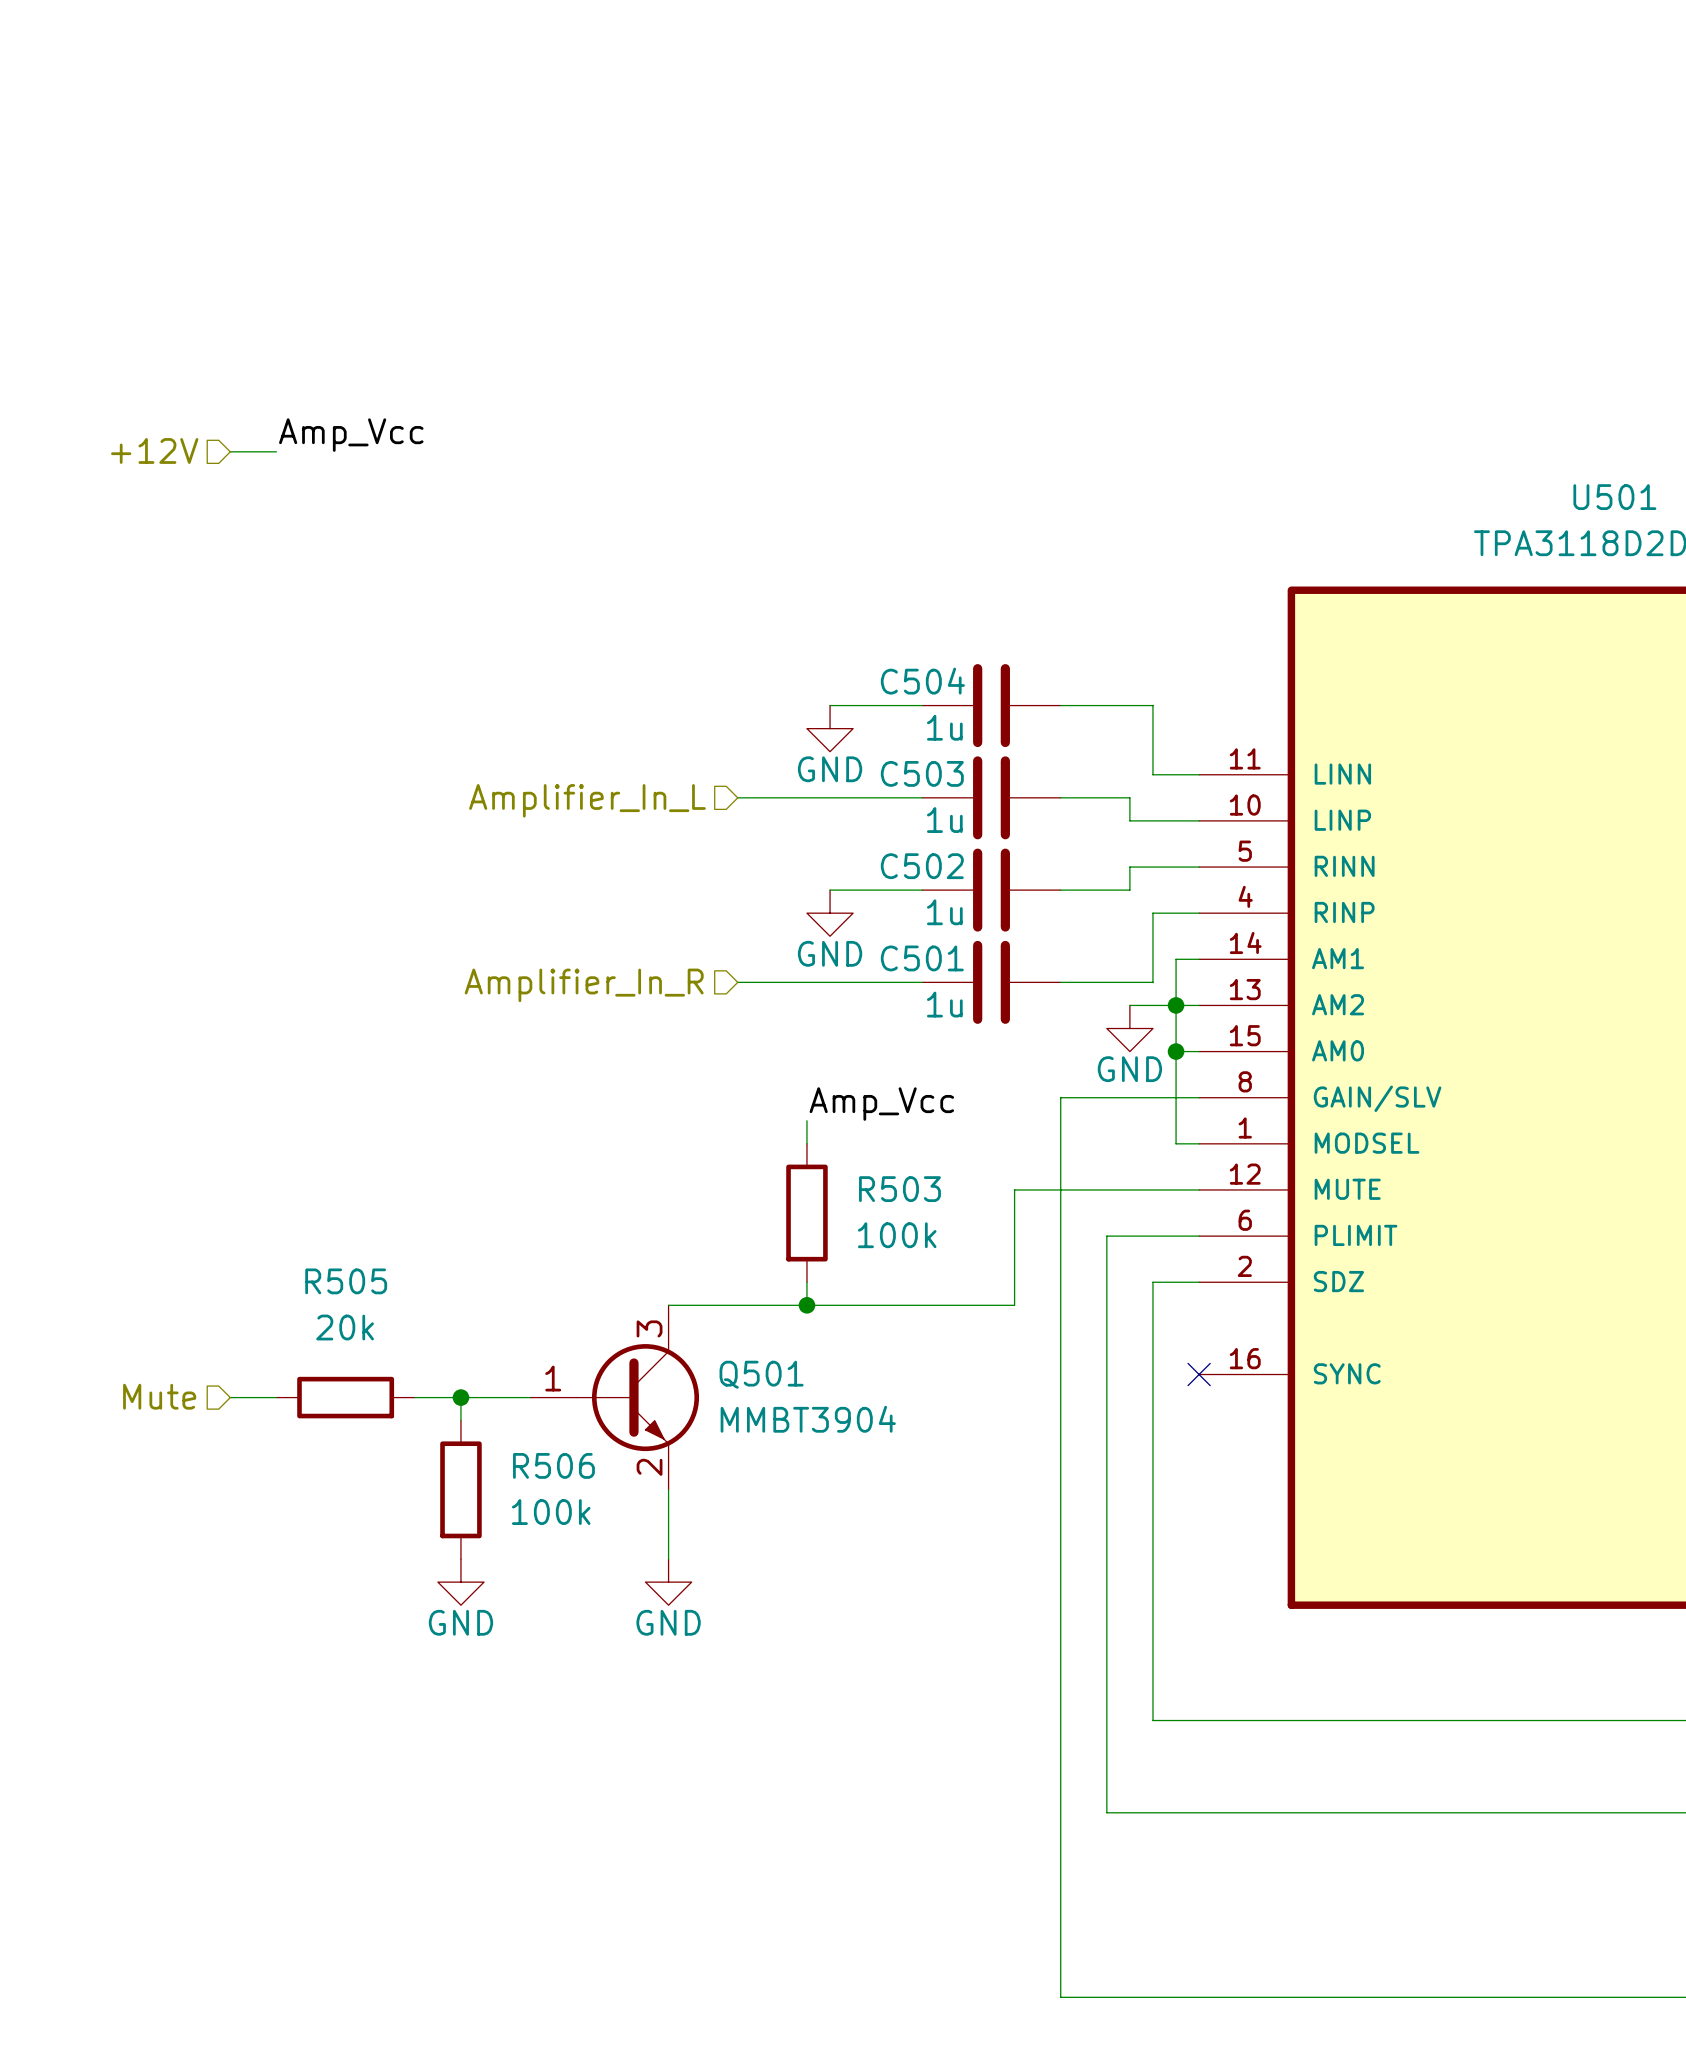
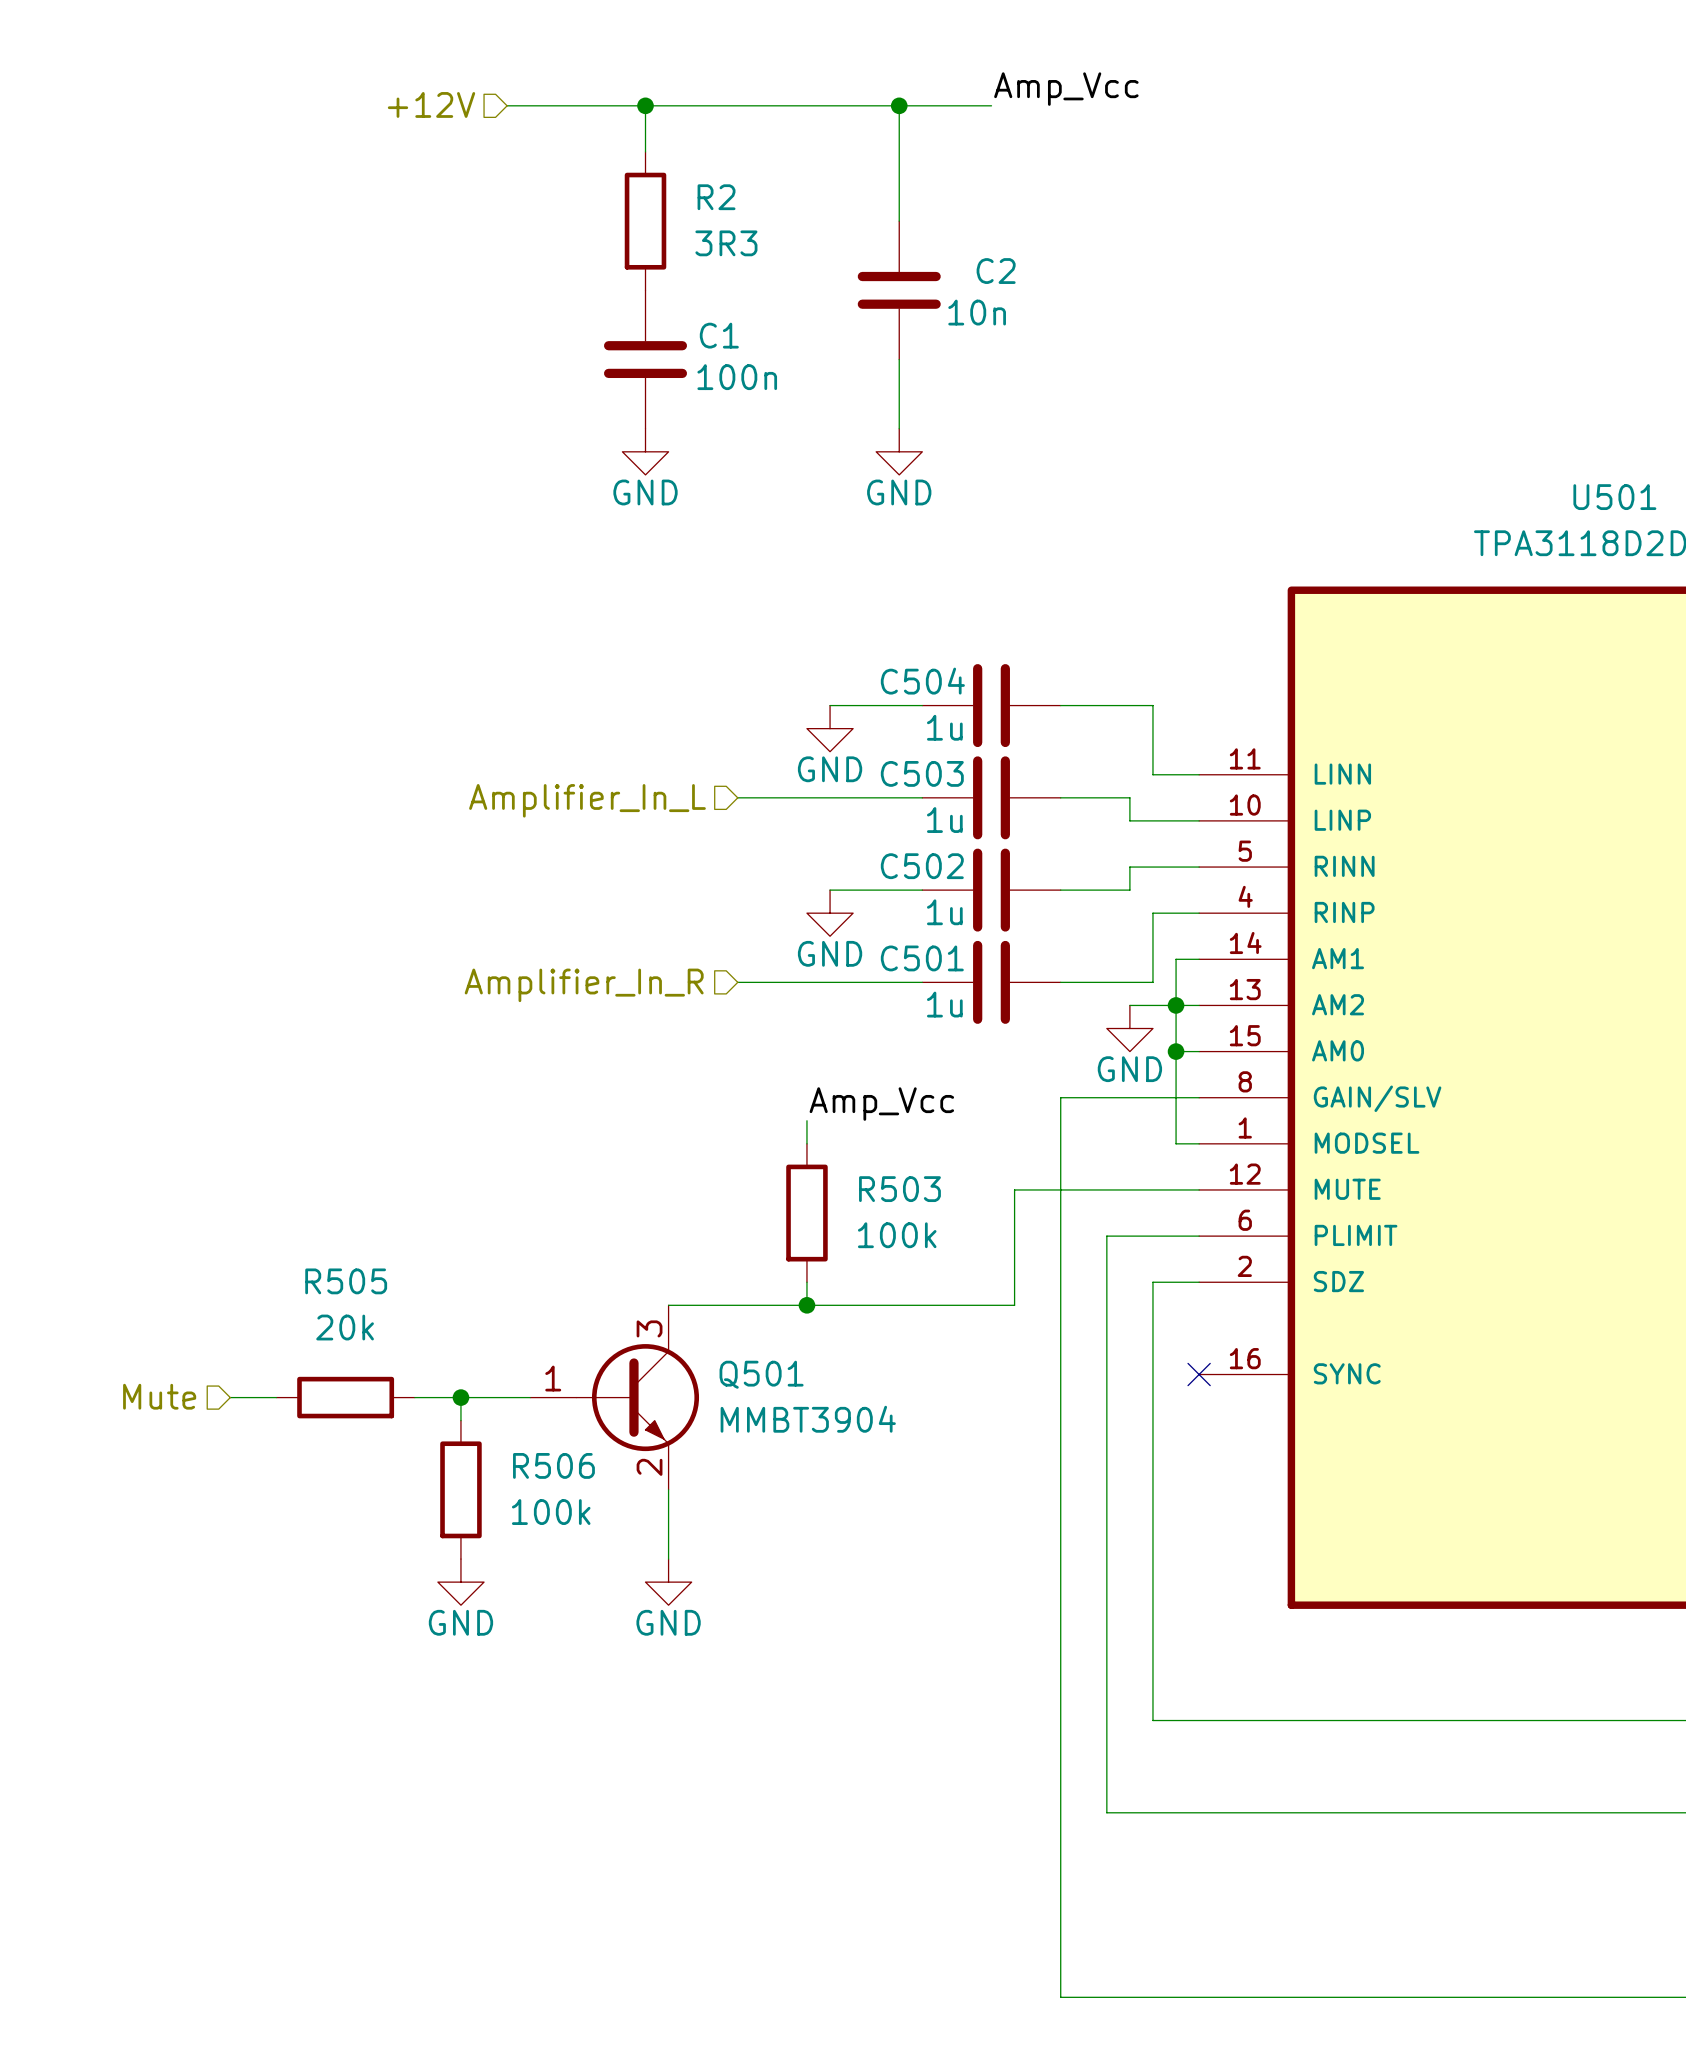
label: none -> Amp_Vcc (1066, 89)
wire: none -> (507, 105) (991, 105)
wire: none -> (645, 105) (645, 151)
junction: none -> (645, 105)
wire: none -> (899, 105) (899, 221)
junction: none -> (899, 105)
R2: none -> 3R3 (645, 221)
C2: none -> 10n (899, 290)
C1: none -> 100n (645, 359)
wire: none -> (899, 359) (899, 428)
label: Amp_Vcc (351, 435) -> none
hierarchical label position: +12V (154, 450) -> +12V (431, 104)
wire: (230, 451) (276, 451) -> none
power symbol: none -> GND (645, 451)
power symbol: none -> GND (899, 451)

